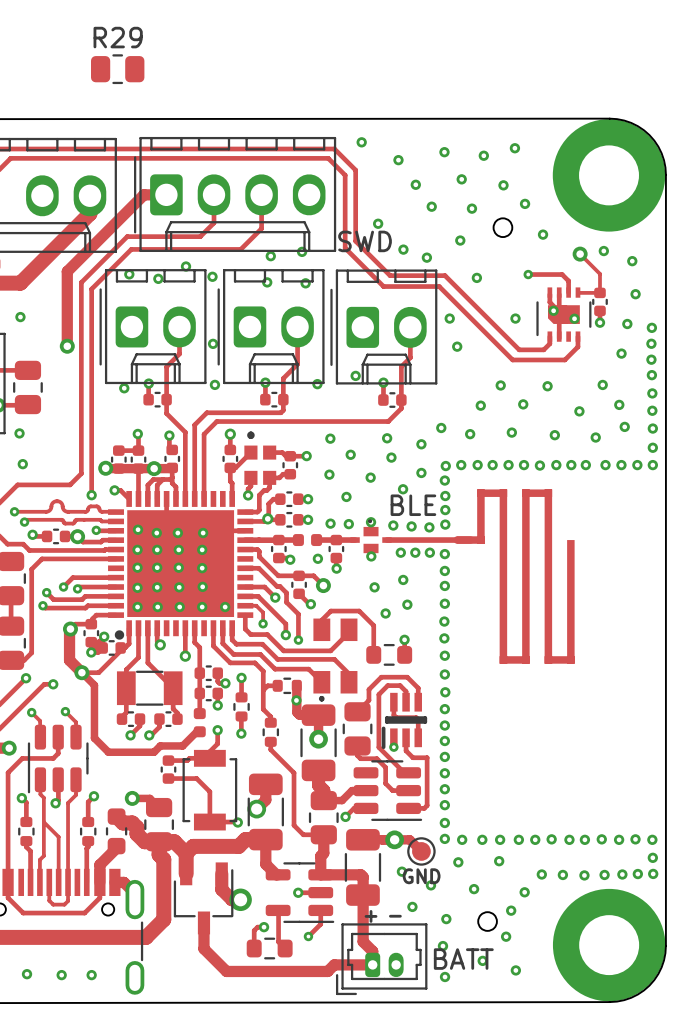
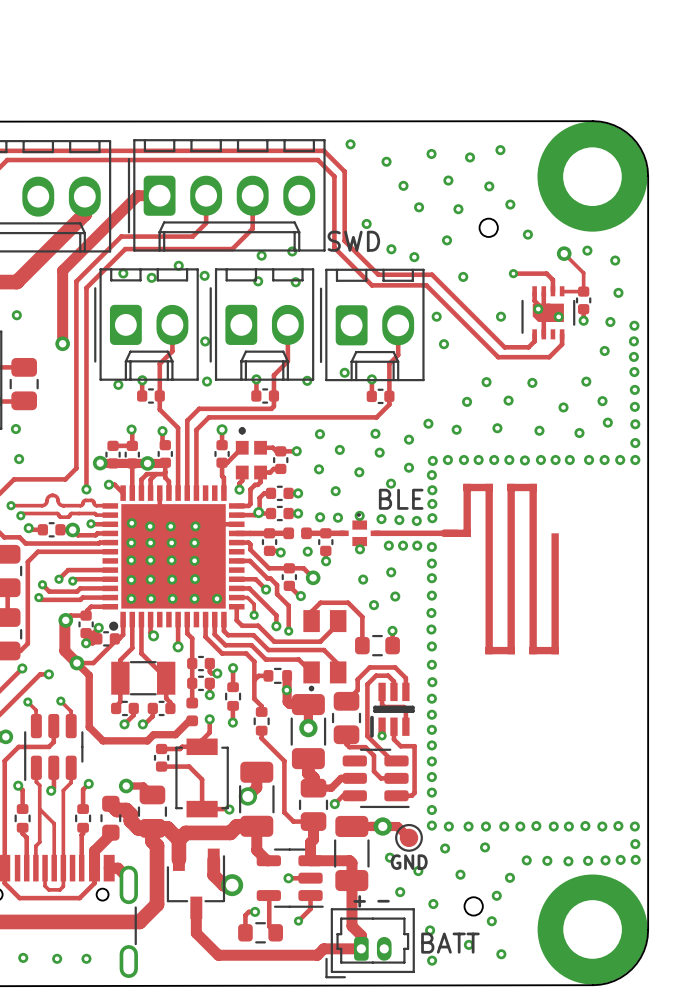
R29: (117, 69) -> none

